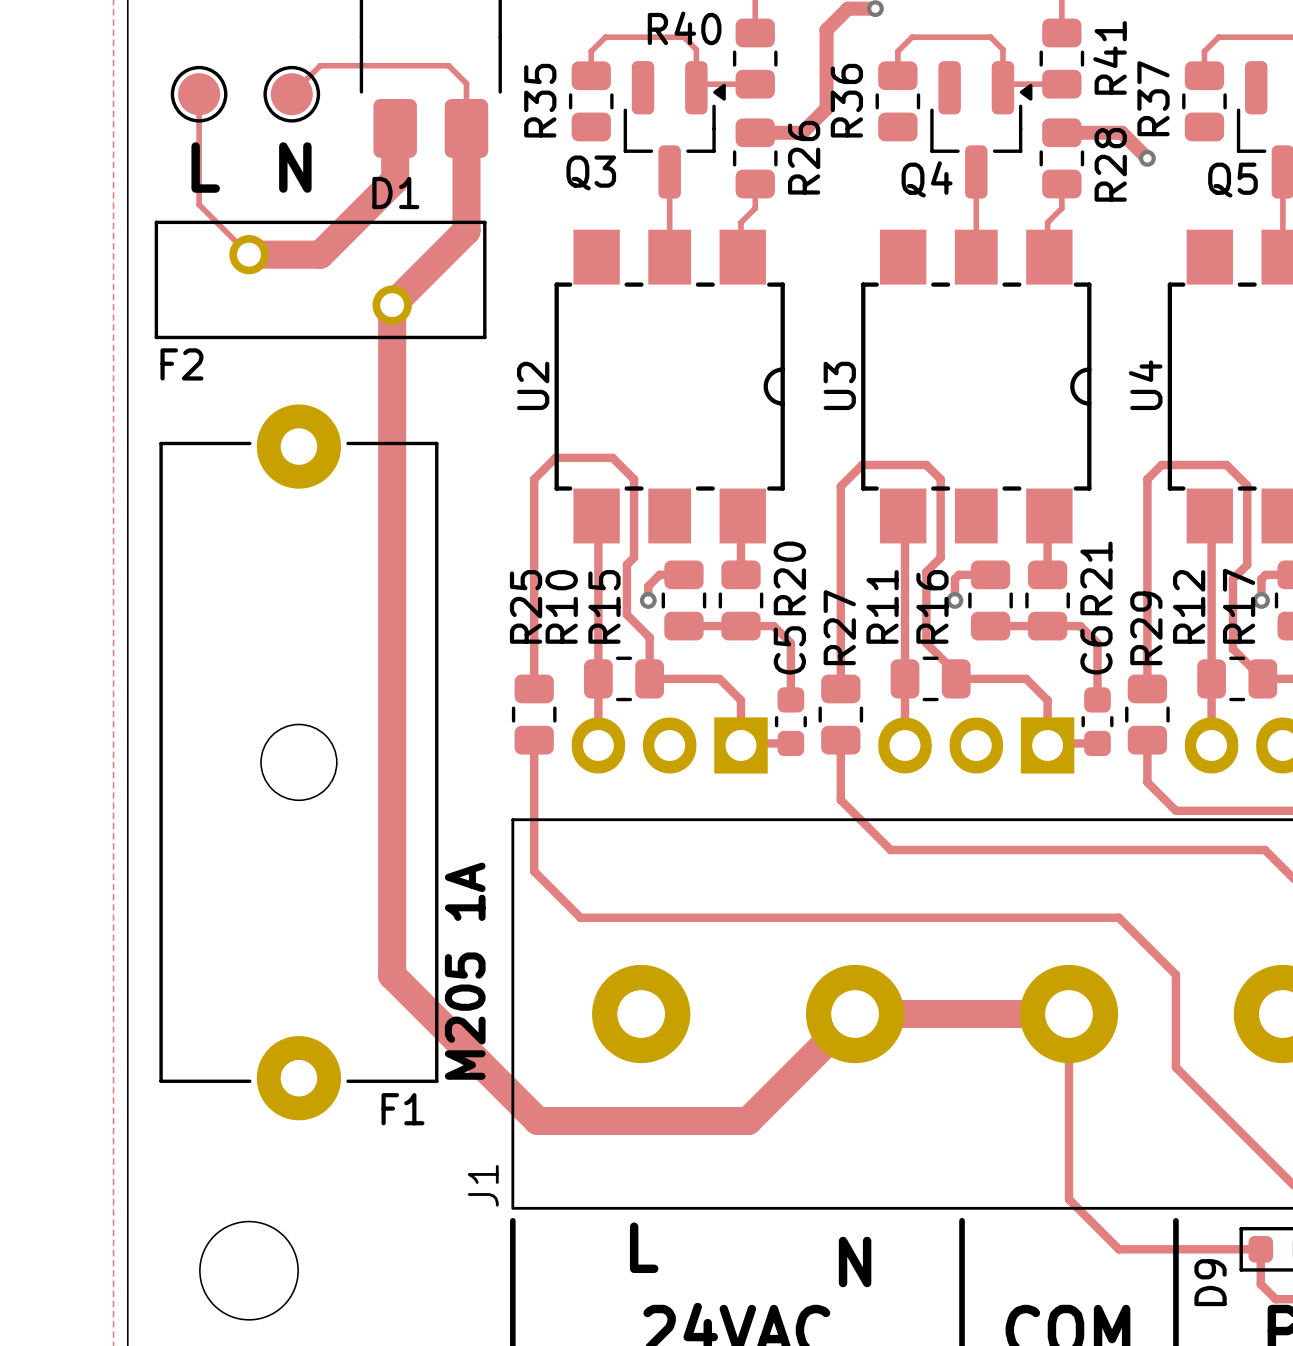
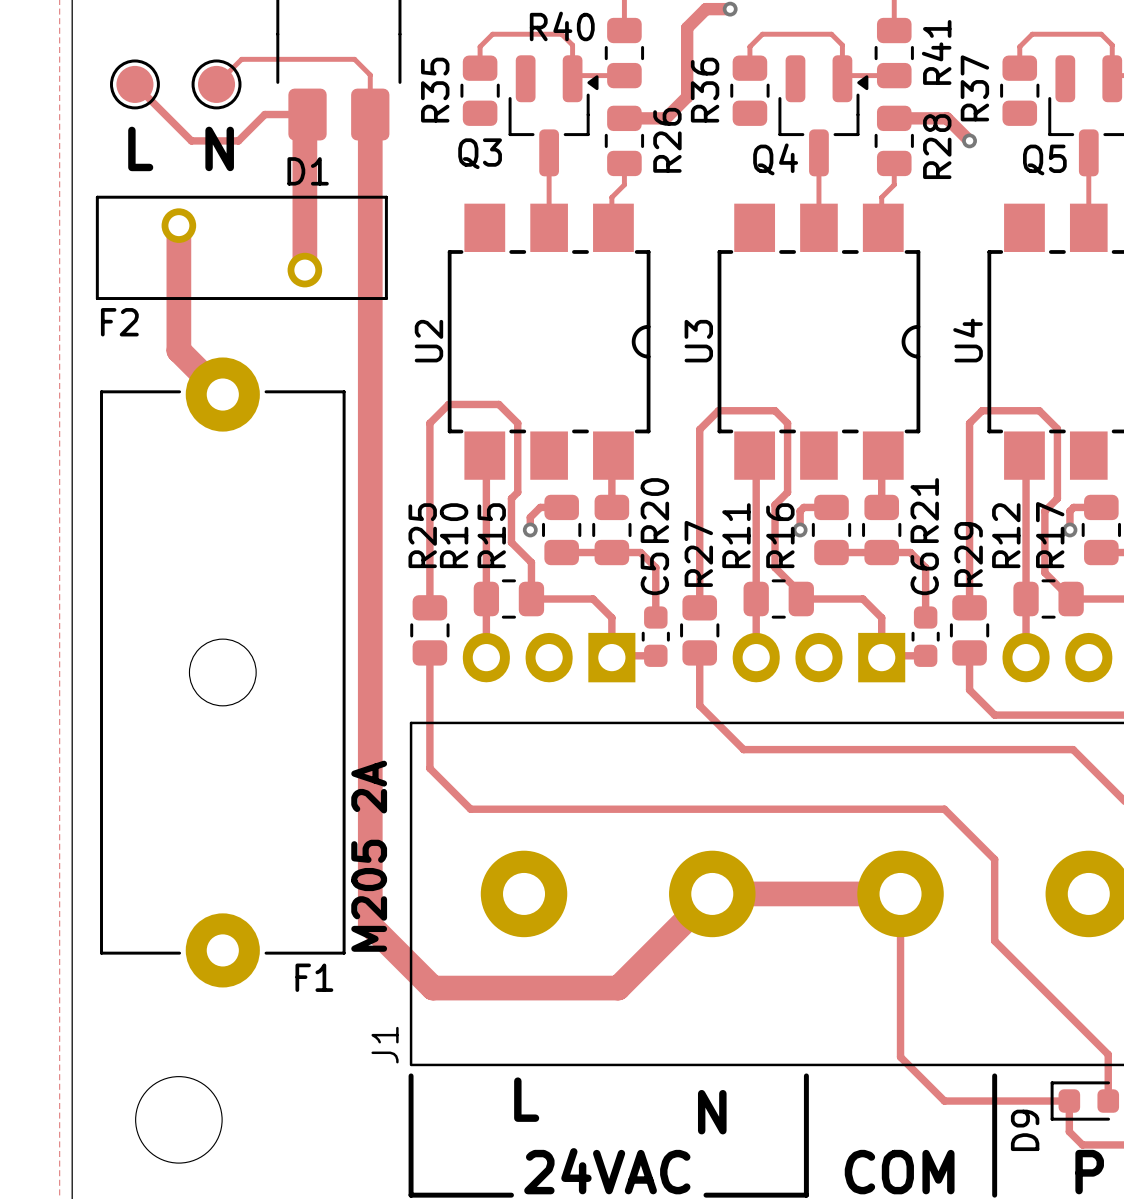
track: (199, 94) (199, 204) (249, 254) (320, 254) (395, 179) (395, 128) -> (134, 84) (191, 140) (238, 140) (264, 114) (307, 114) (304, 117) (304, 270)
track: (466, 230) (392, 305) (392, 975) (466, 1049) -> (370, 204) (370, 925)
track: none -> (178, 225) (178, 350) (222, 394)
text: M205 1A (465, 971) -> M205 2A (369, 856)

